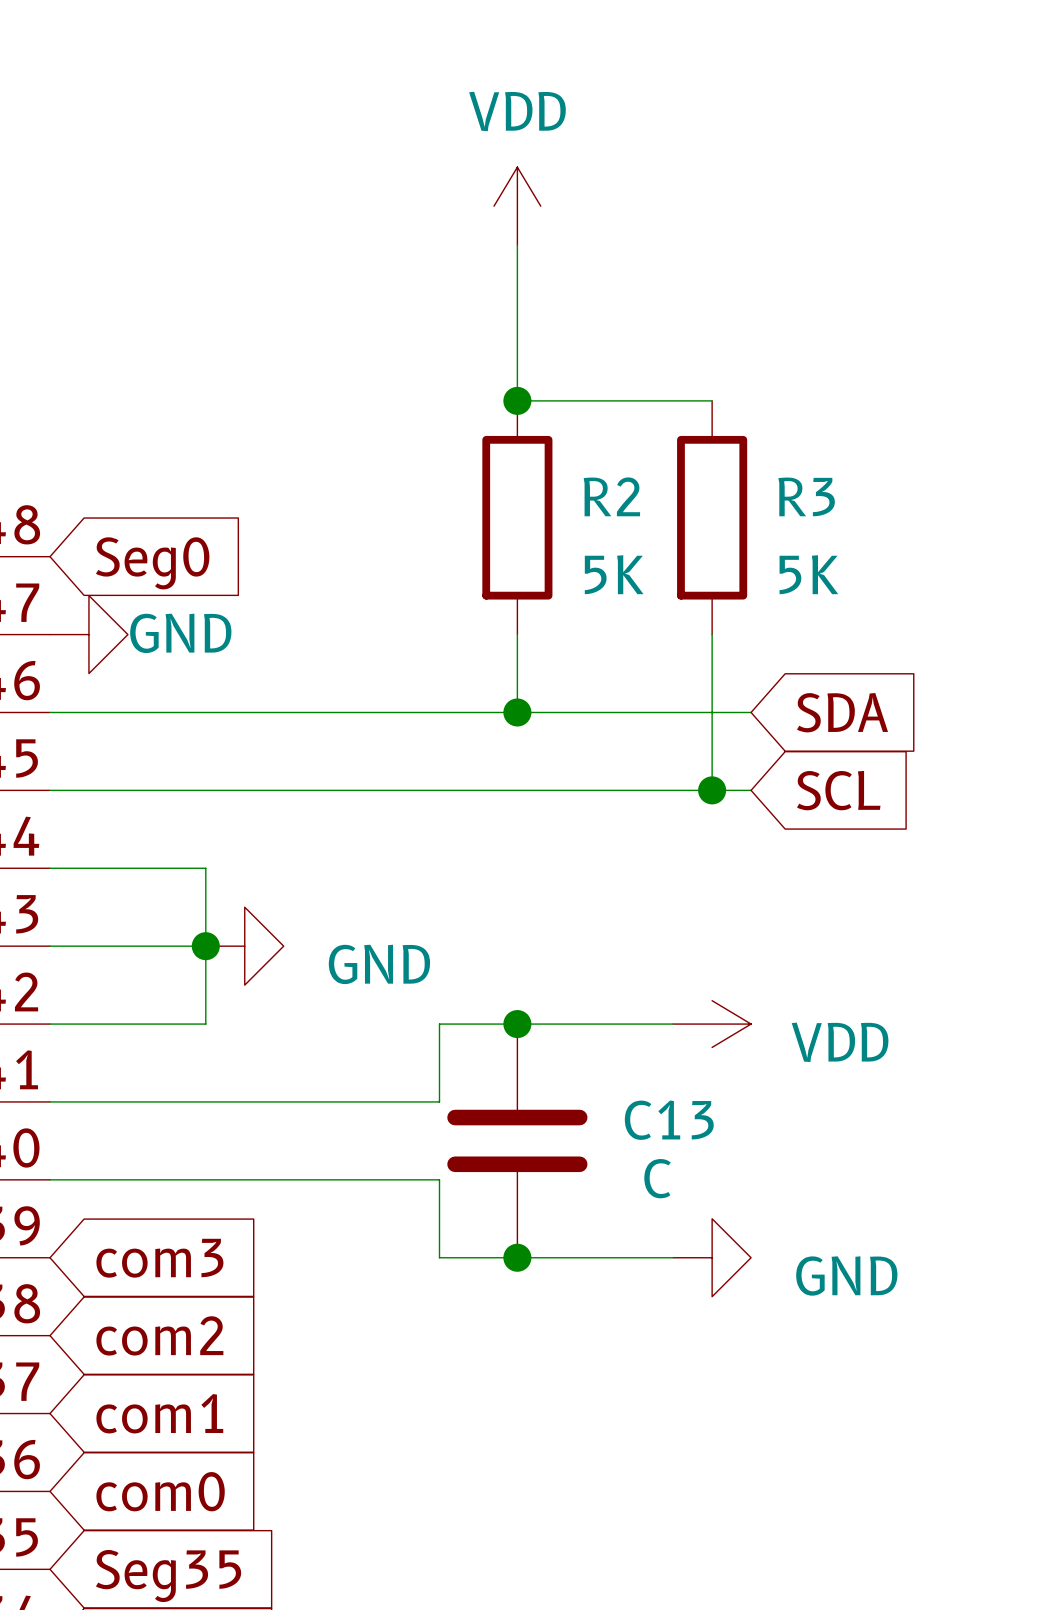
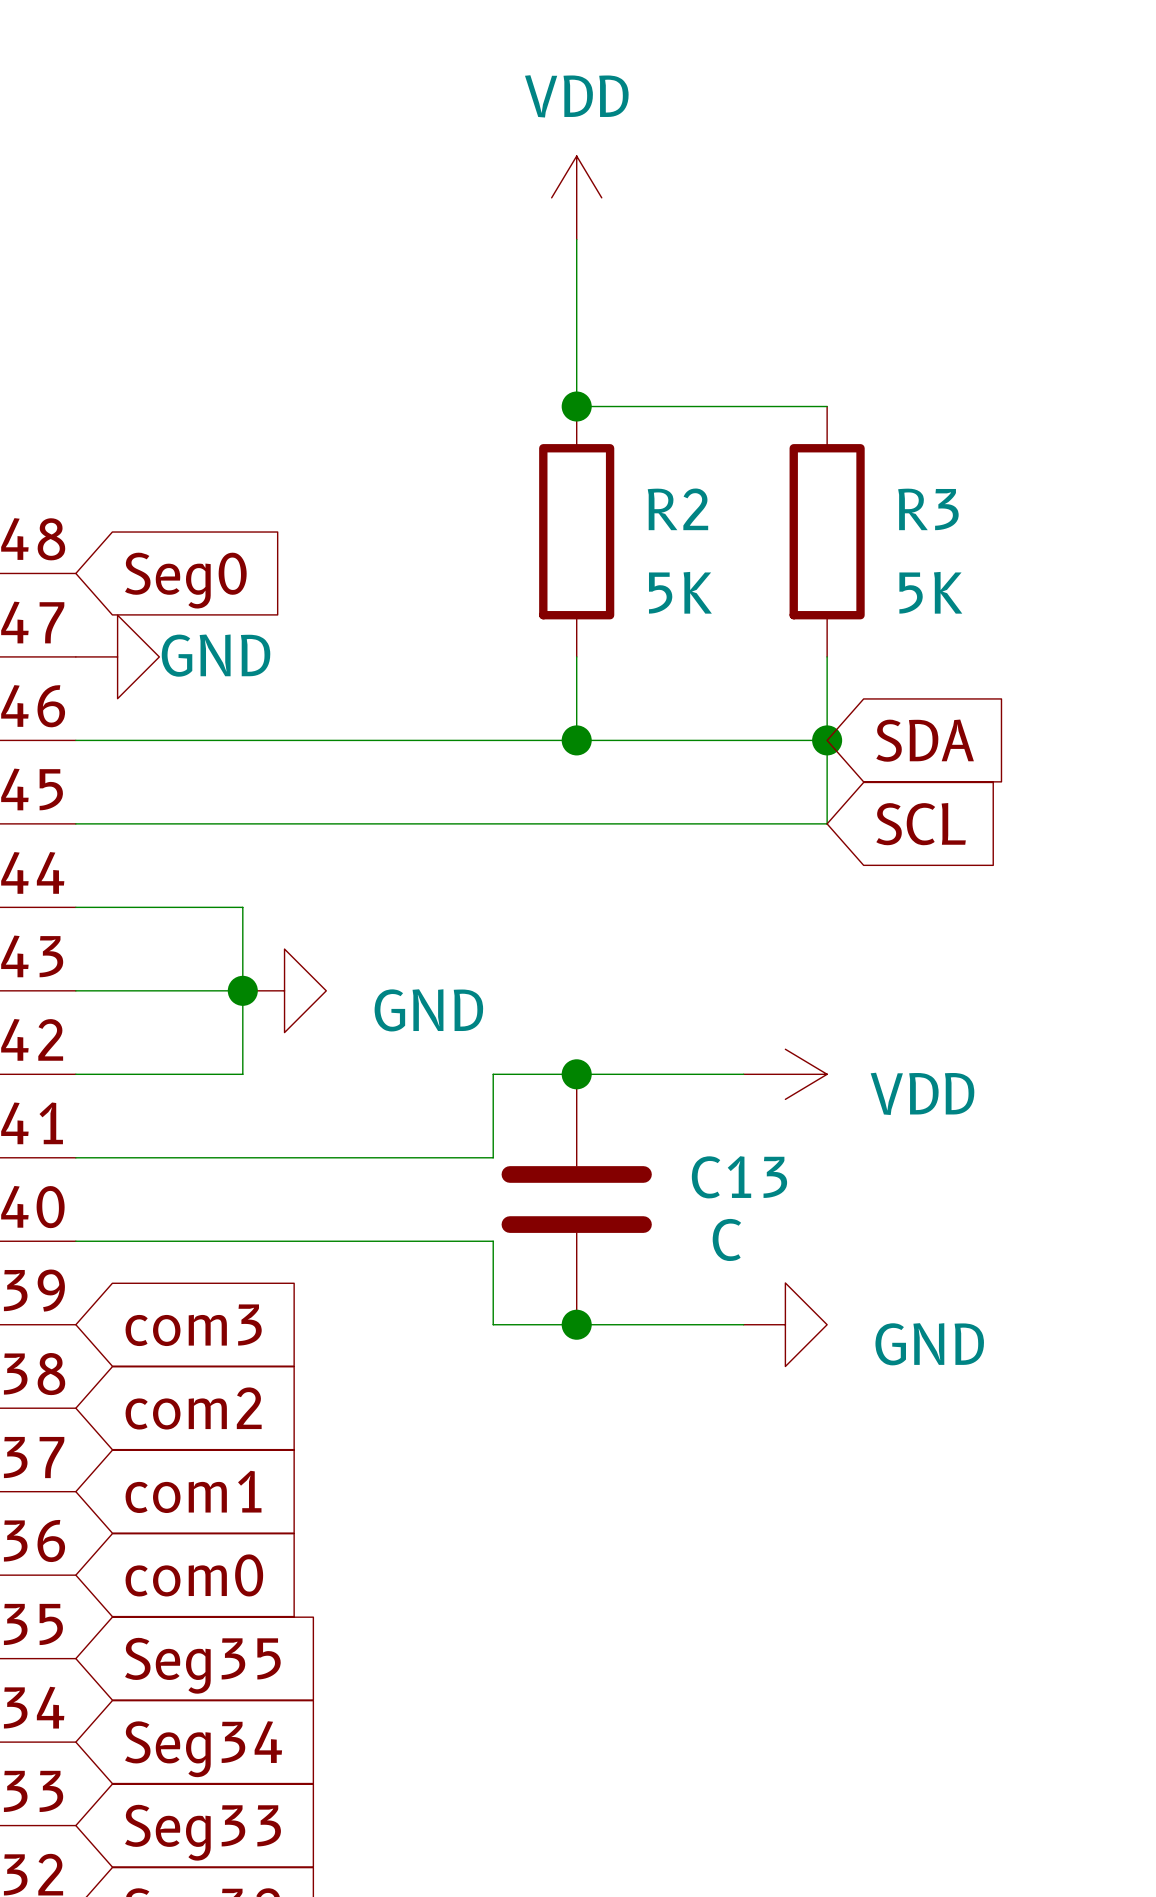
wire: none -> (785, 406) (827, 406)
R3 position: (712, 517) -> (827, 531)
wire: (712, 634) (712, 790) -> (827, 656) (827, 823)
junction position: (712, 790) -> (827, 740)

